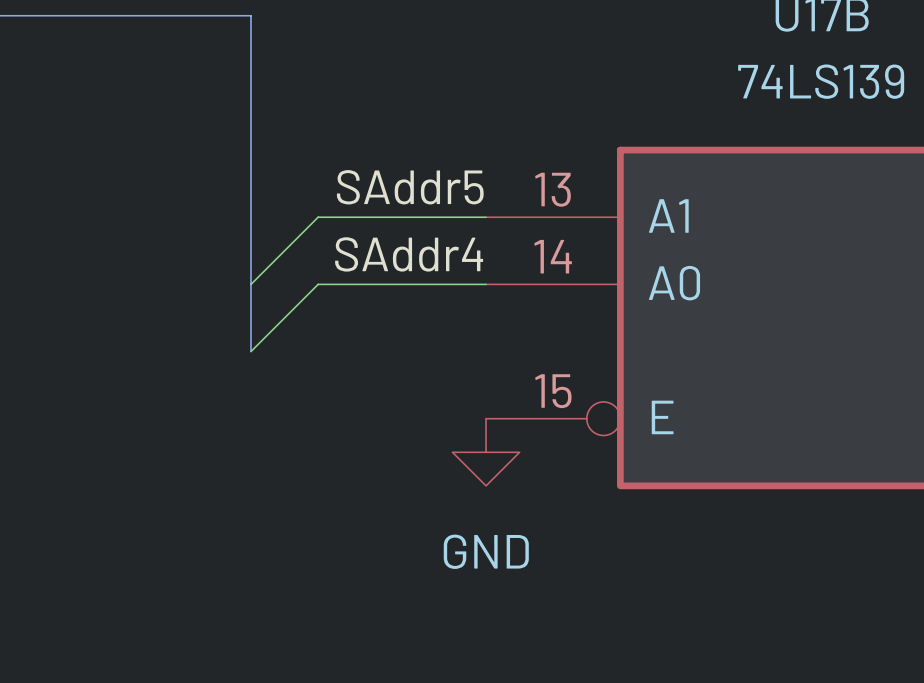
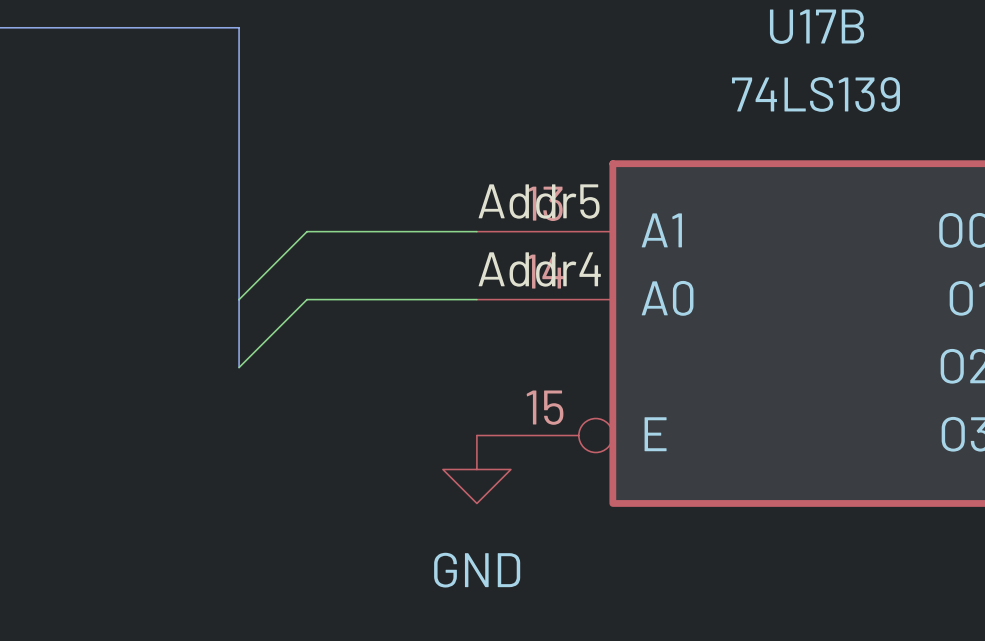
label: SAddr5 (410, 187) -> Addr5 (539, 201)
label: SAddr4 (409, 254) -> Addr4 (539, 269)

